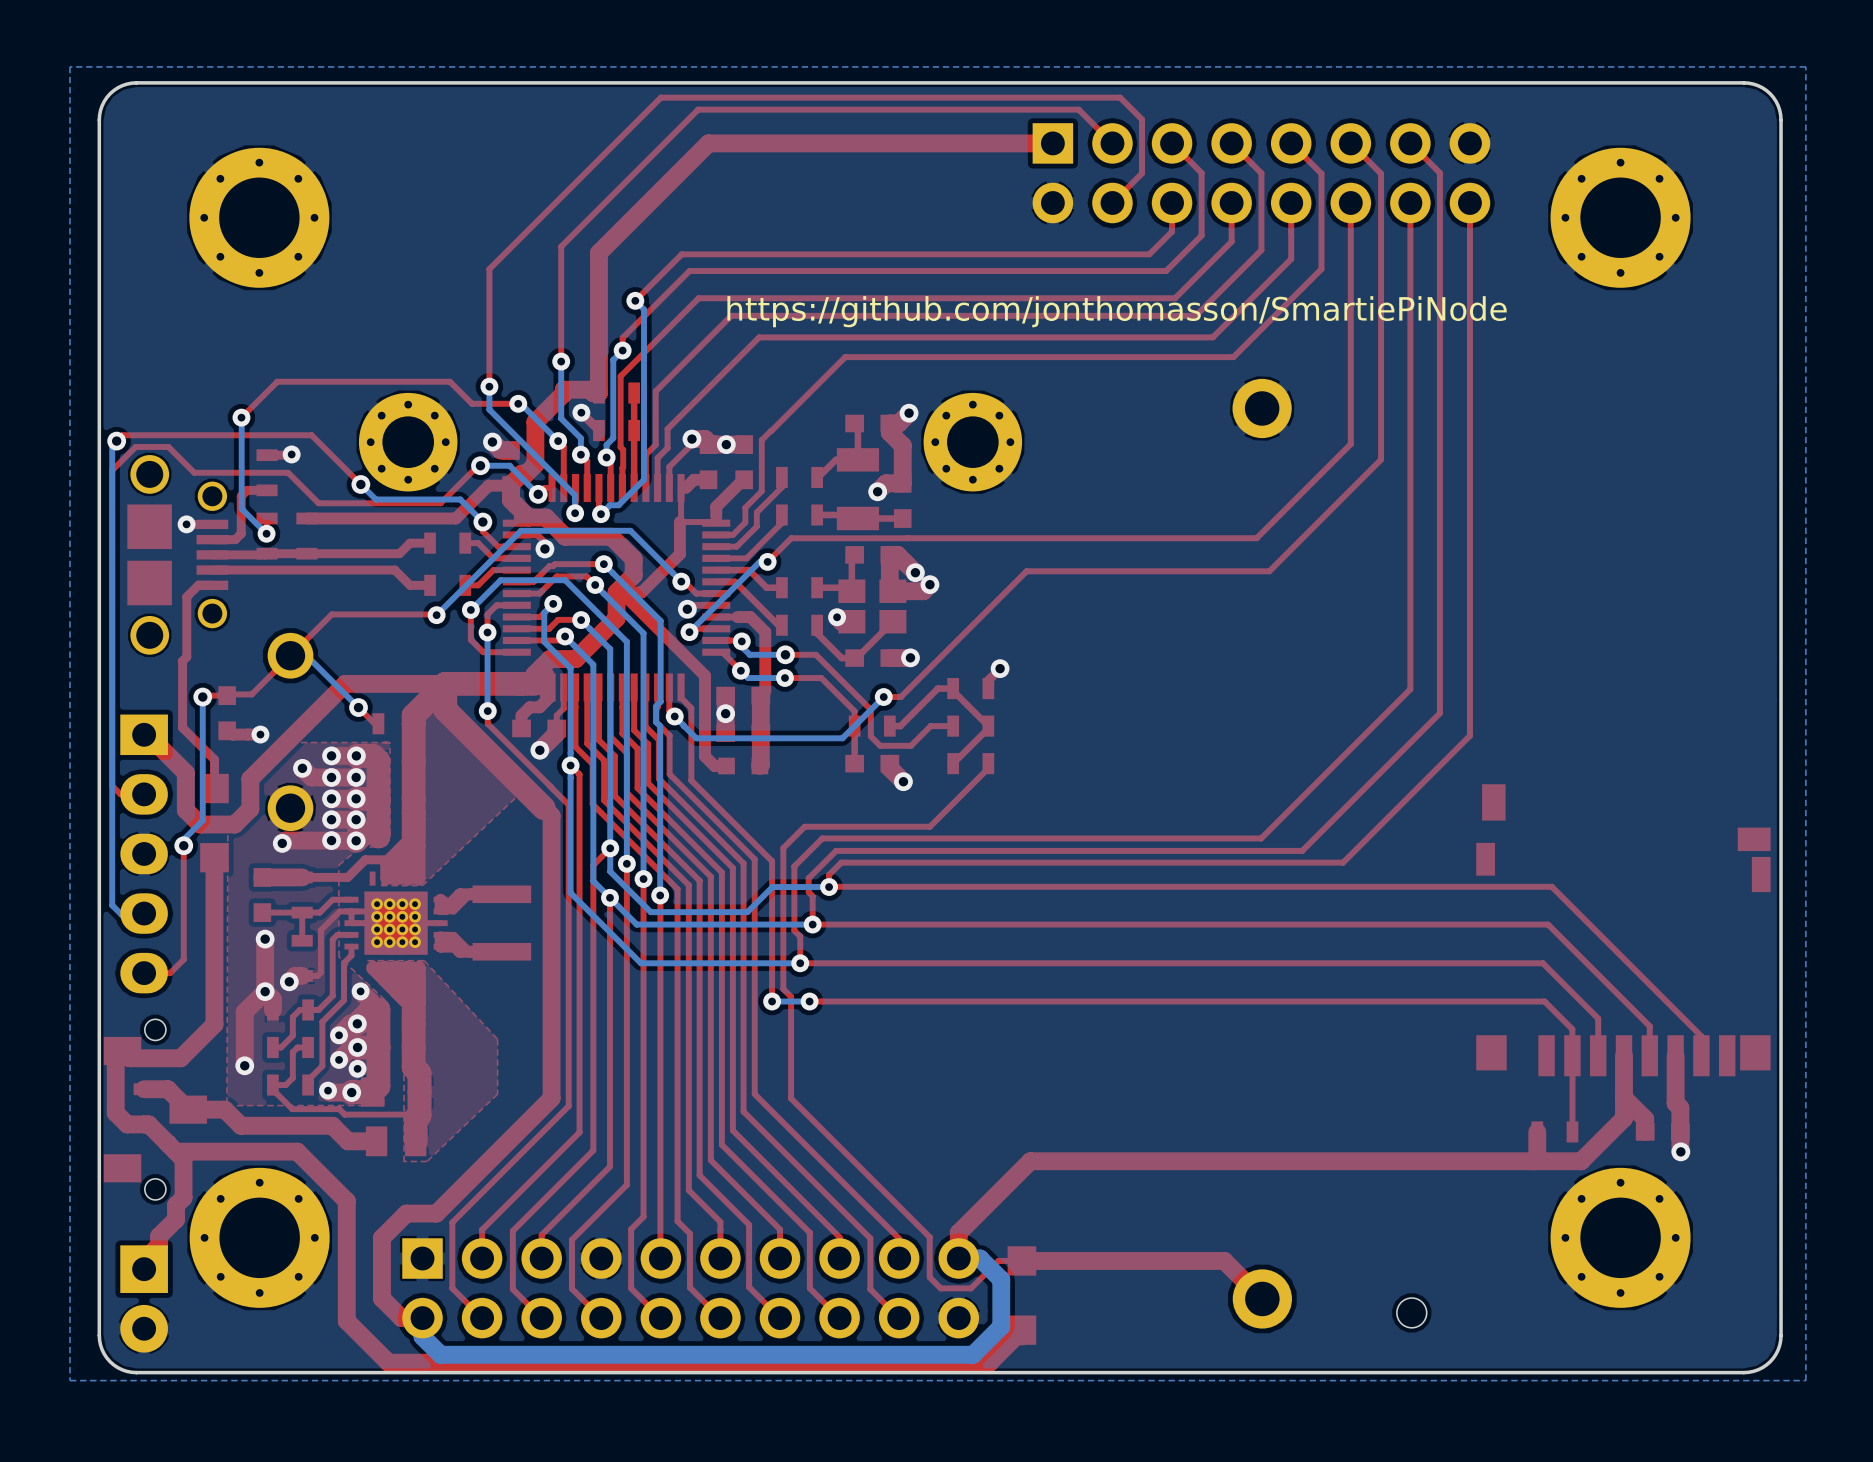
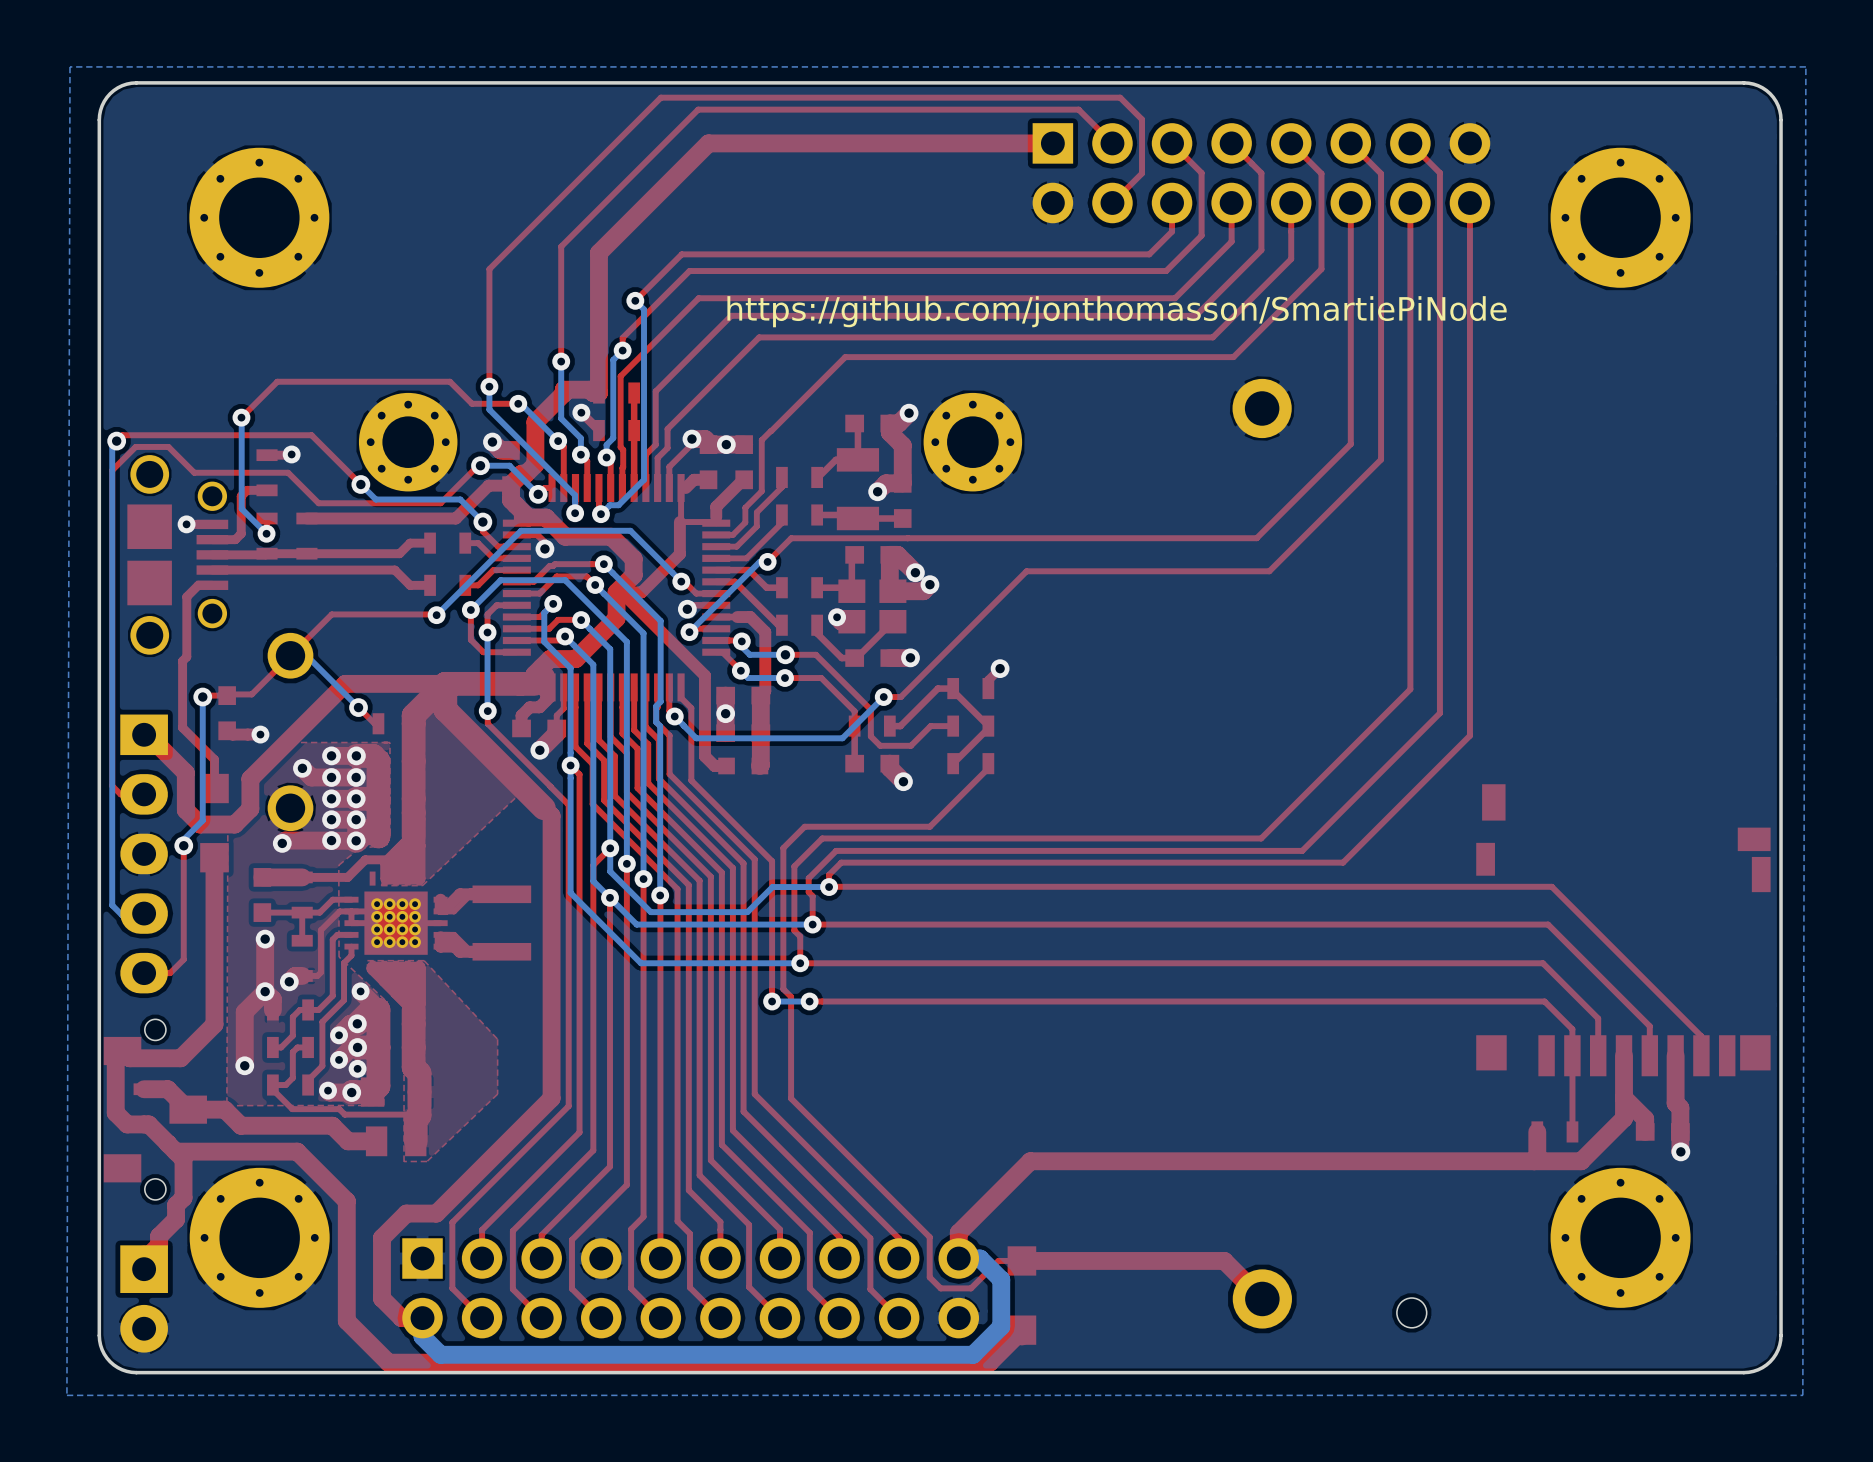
bottom zone outline: (1805, 66) (1805, 1380) (69, 1380) (69, 66) -> (1805, 66) (1802, 1395) (66, 1395) (69, 66)

